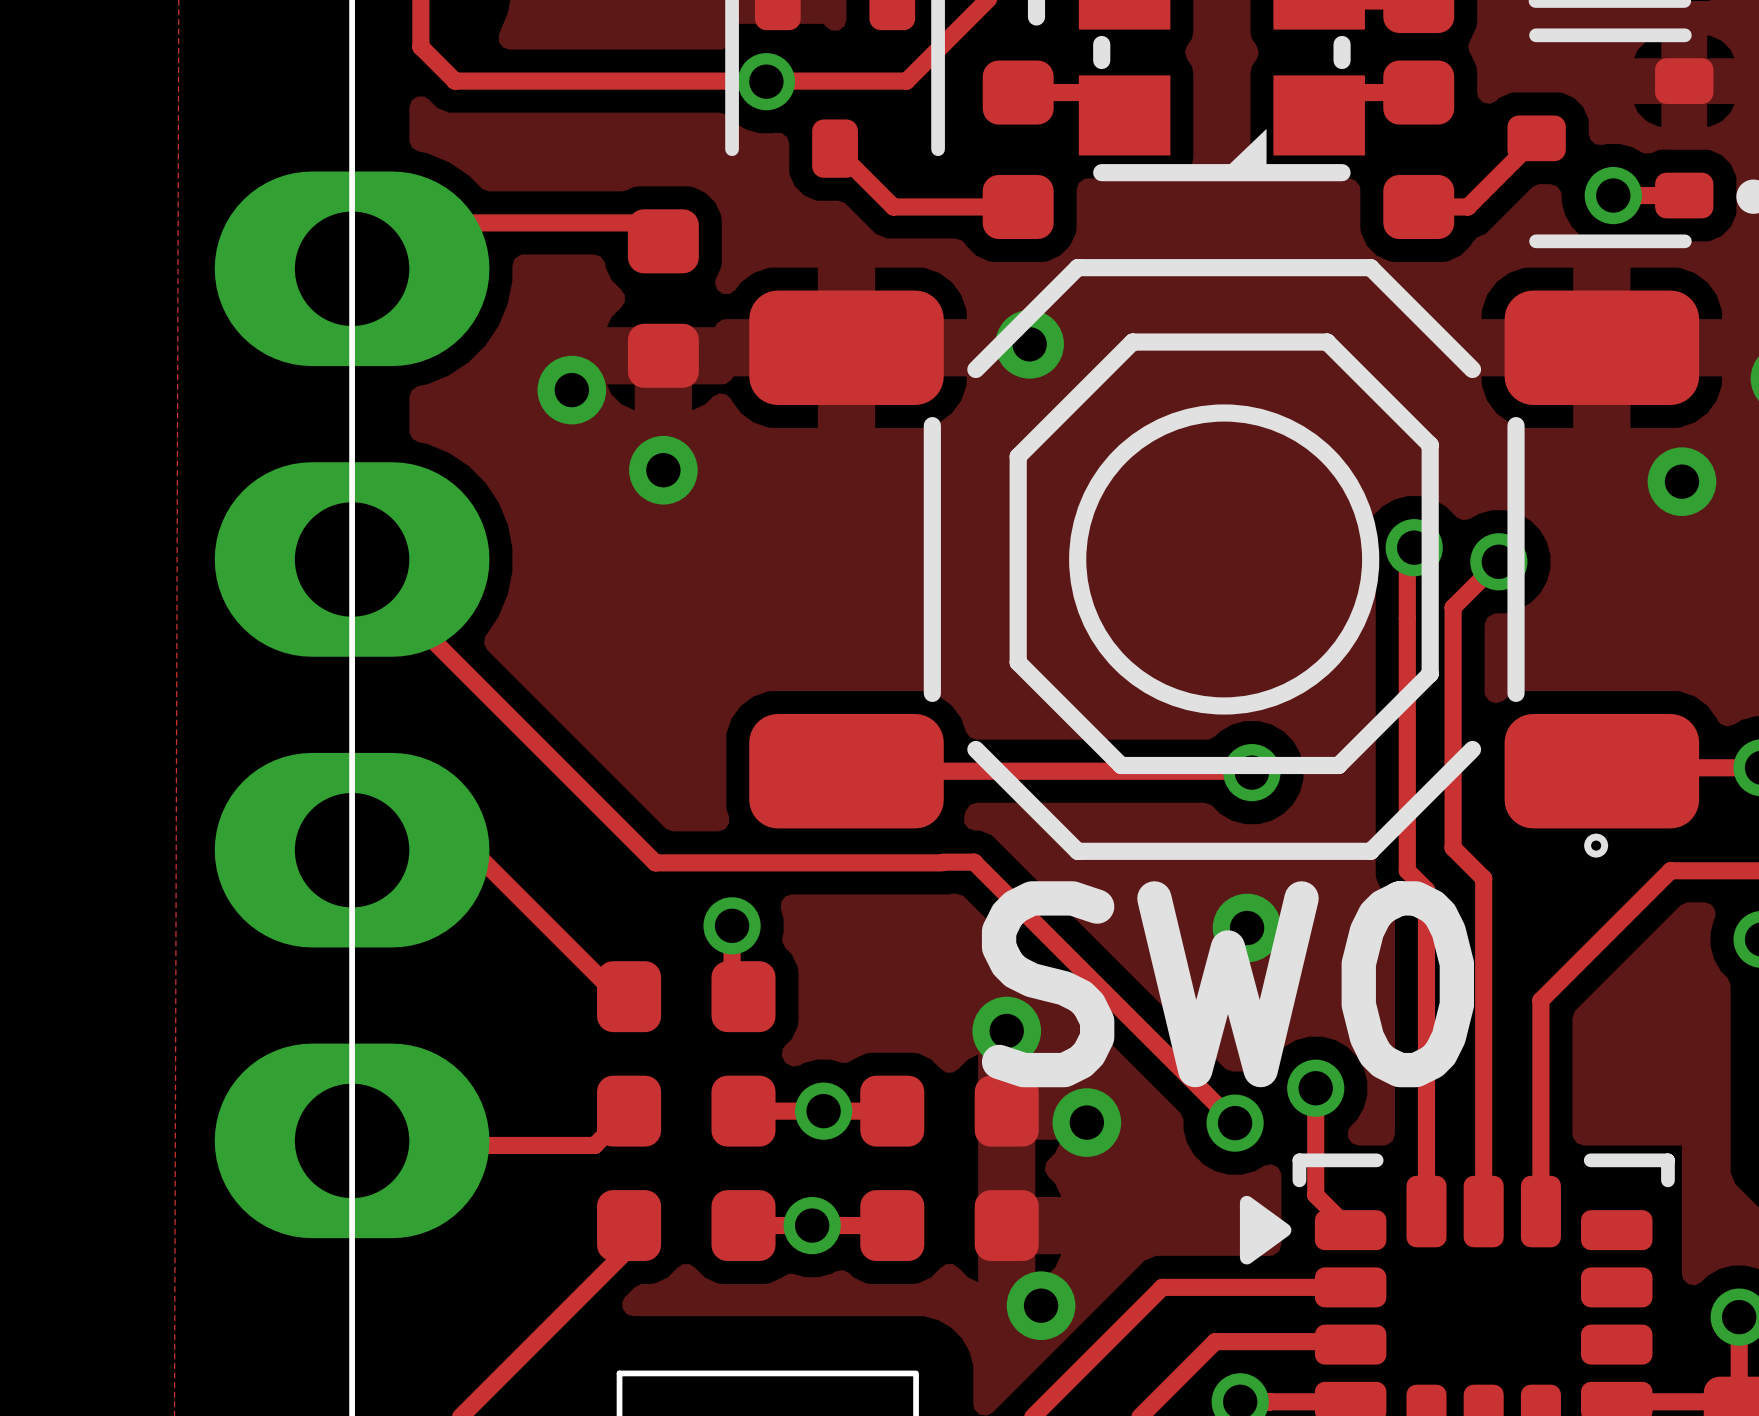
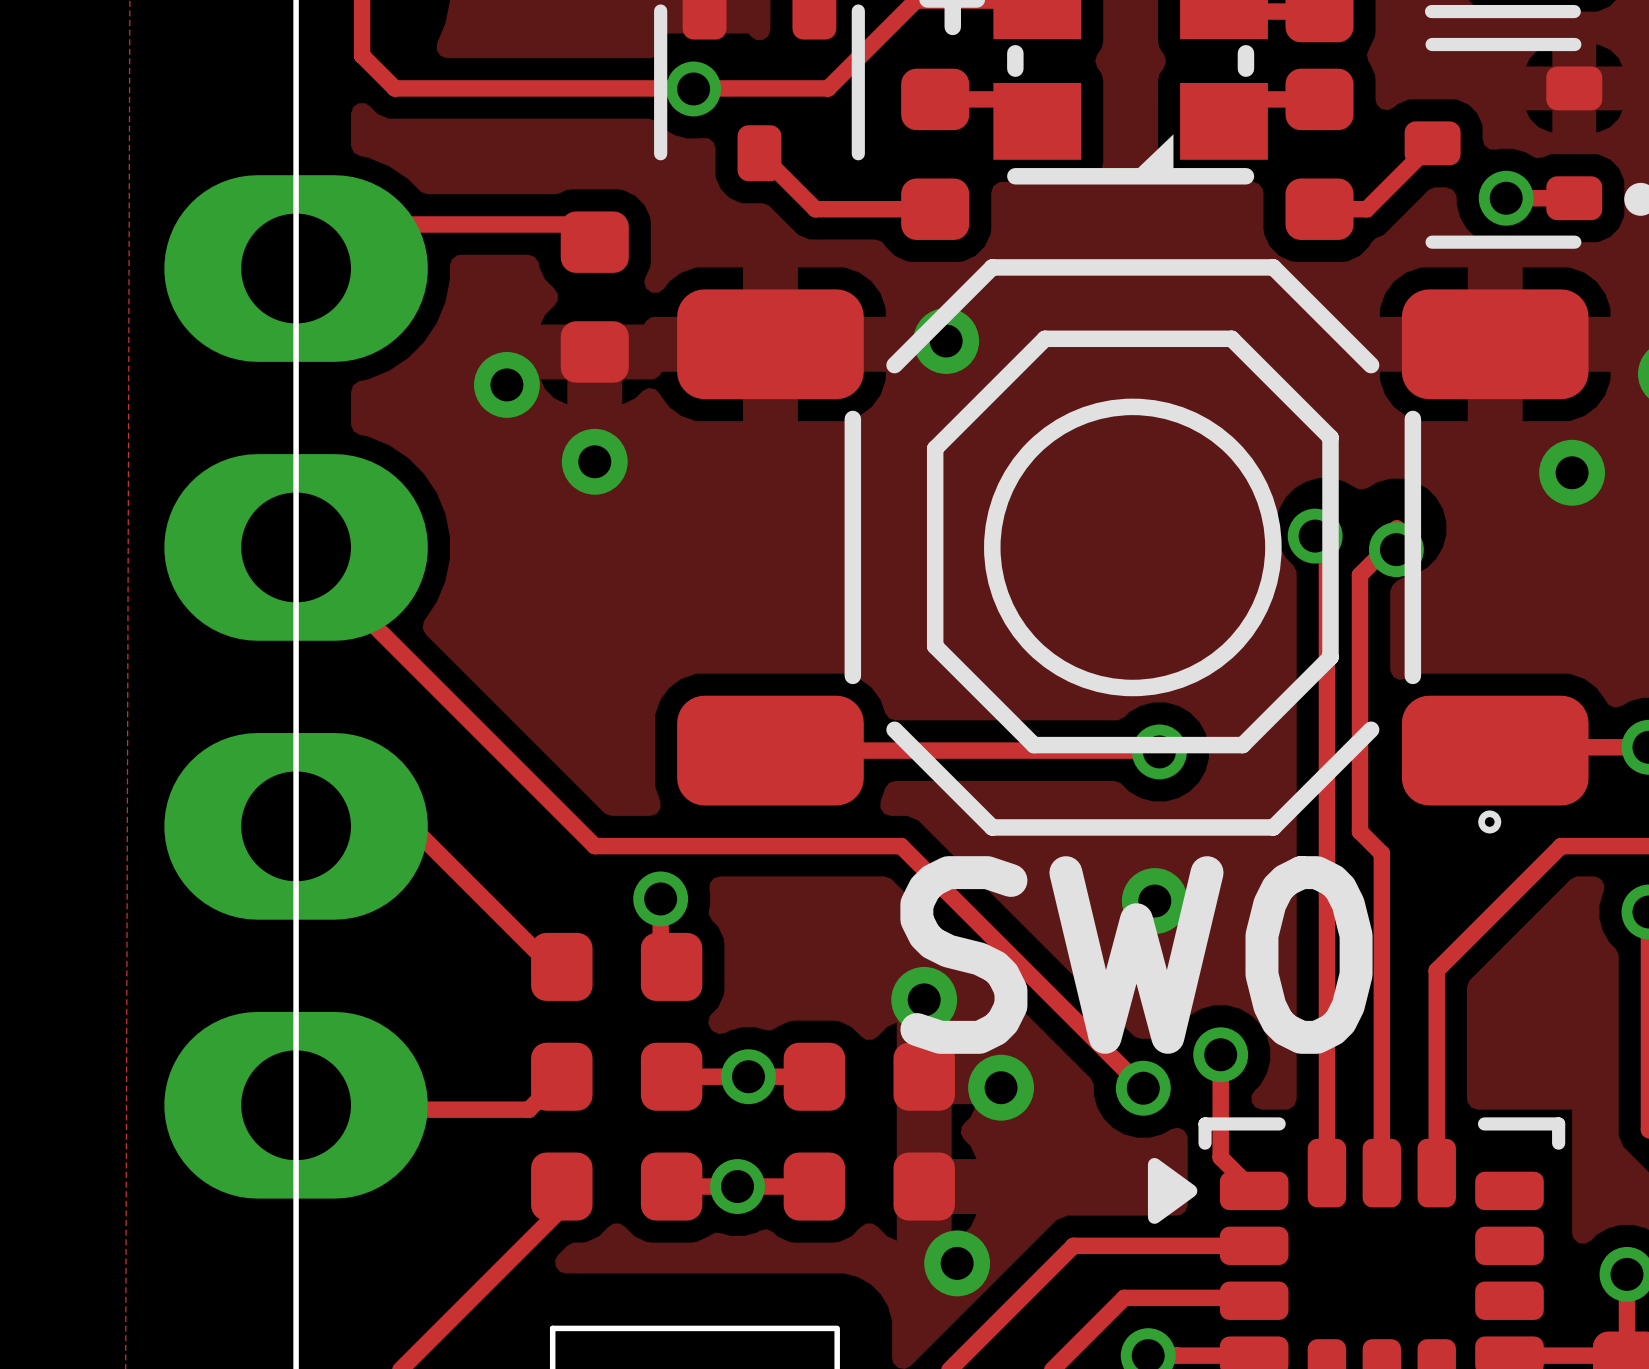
track: (1414, 547) (1407, 554) (1407, 870) (1426, 889) -> (1323, 527) (1326, 530) (1326, 864)
track: (1498, 561) (1453, 607) (1453, 847) (1460, 855) -> (1396, 528) (1396, 538) (1359, 575) (1359, 831)
track: (655, 862) (942, 862) -> (587, 838) (594, 846) (901, 846)
track: (942, 862) (974, 862) (982, 870) -> none

